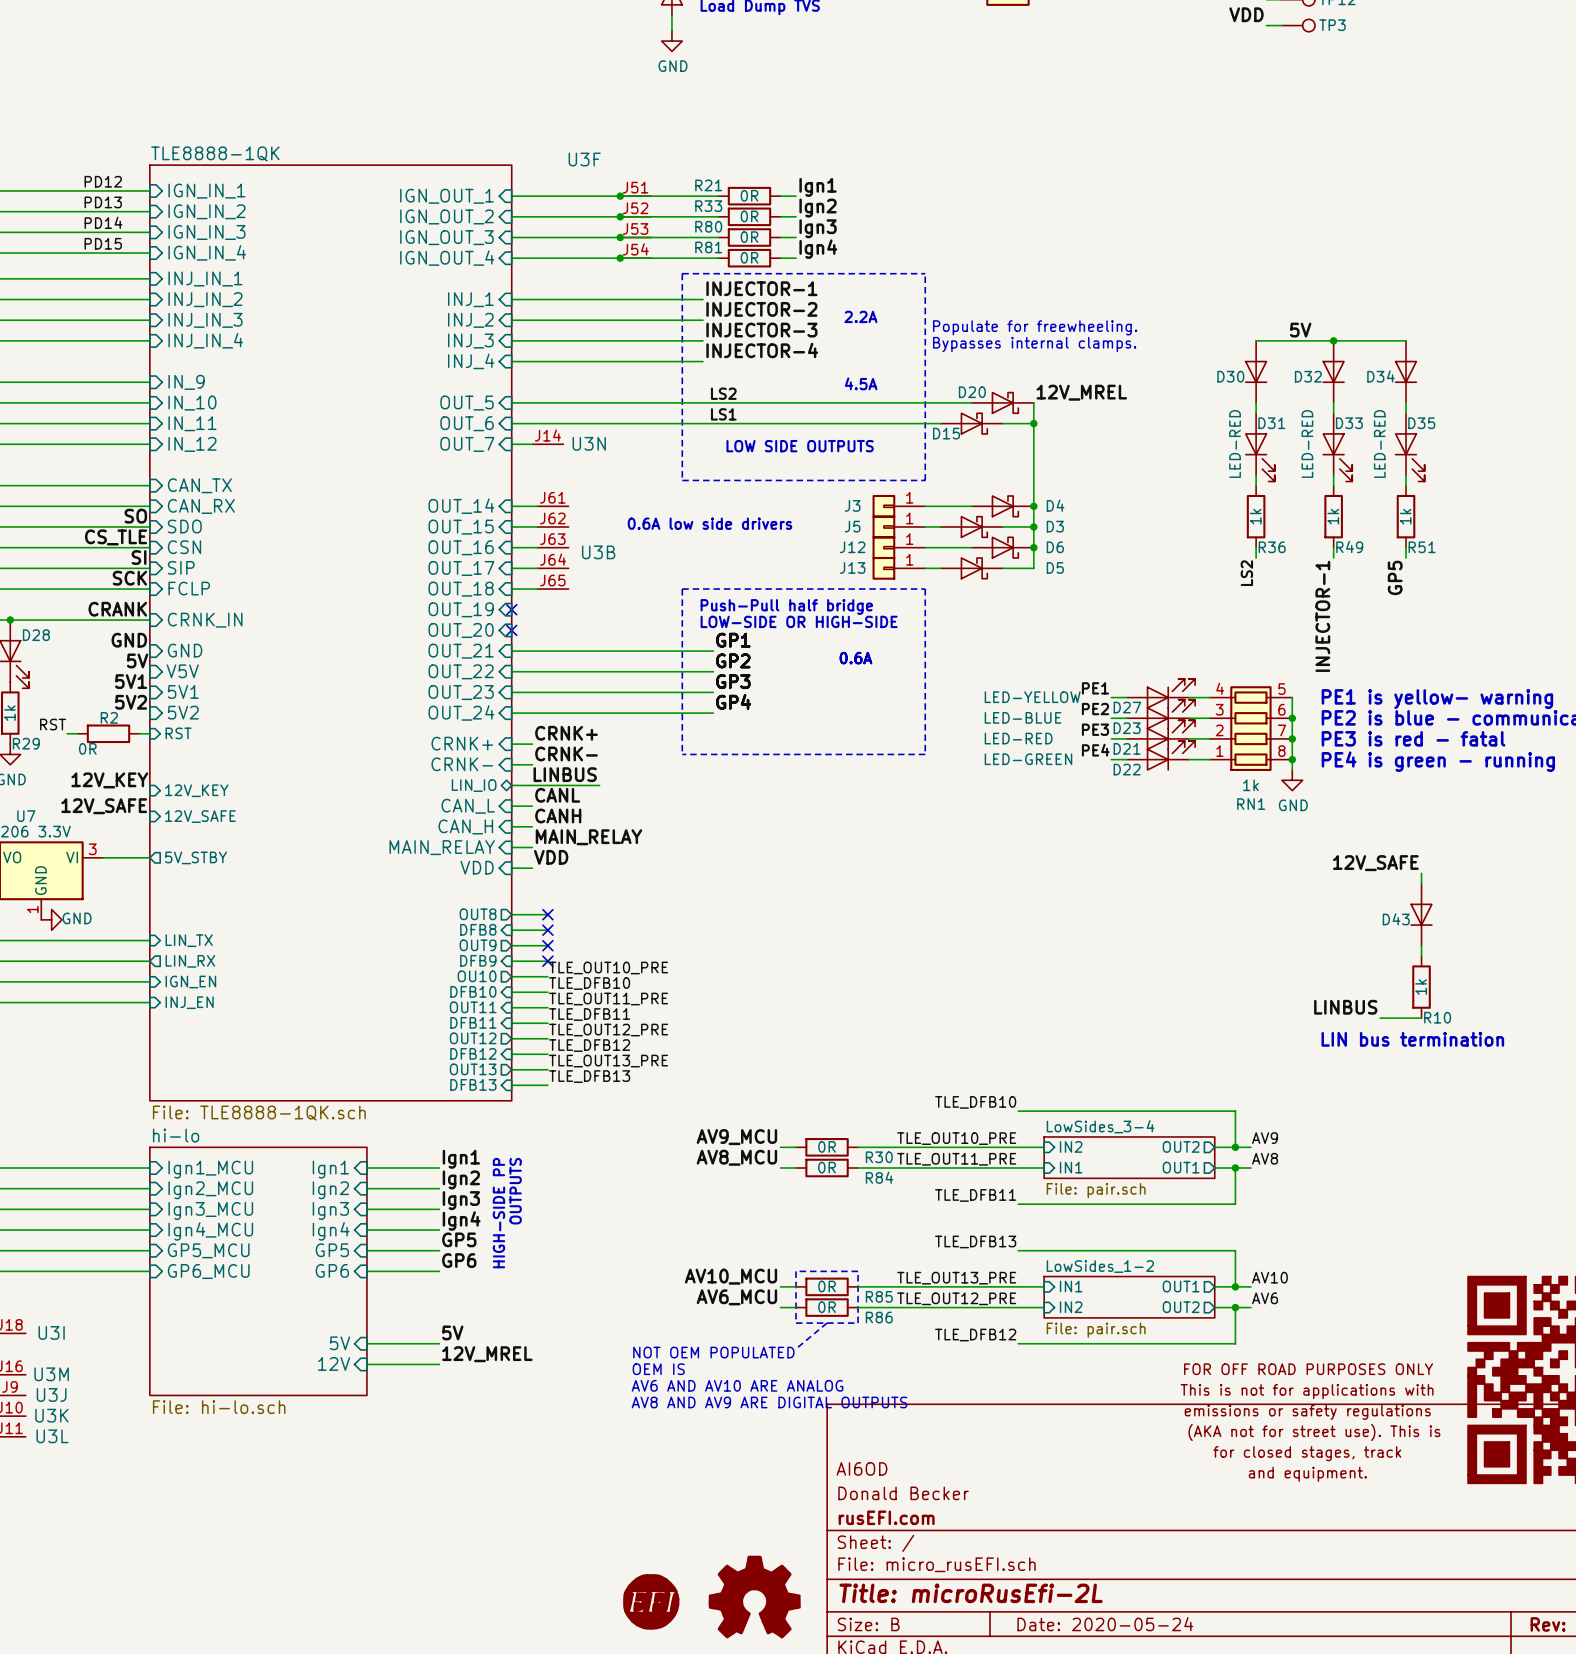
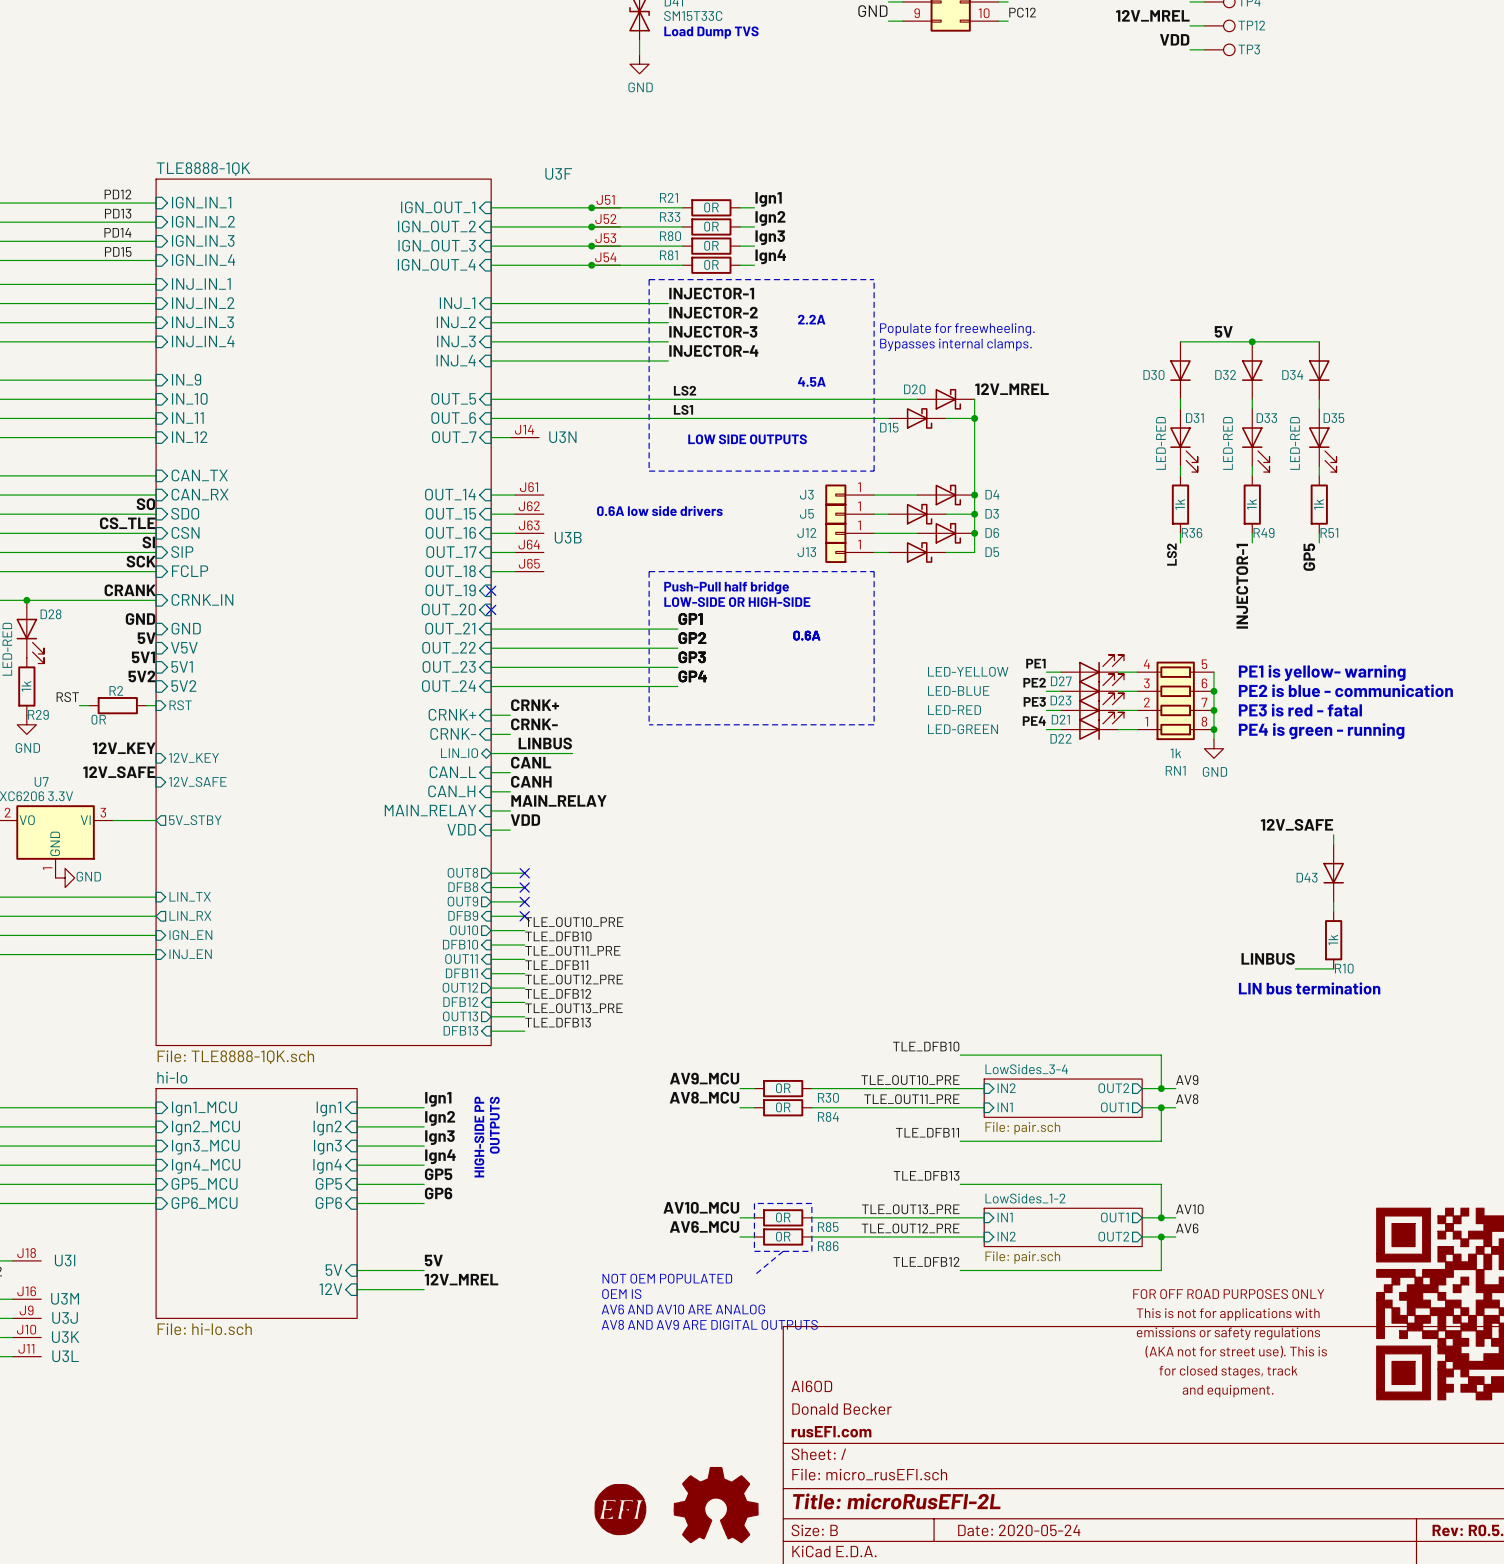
title block: Title: microRusEfi-2L (971, 1593) -> Title: microRusEFI-2L (896, 1501)

